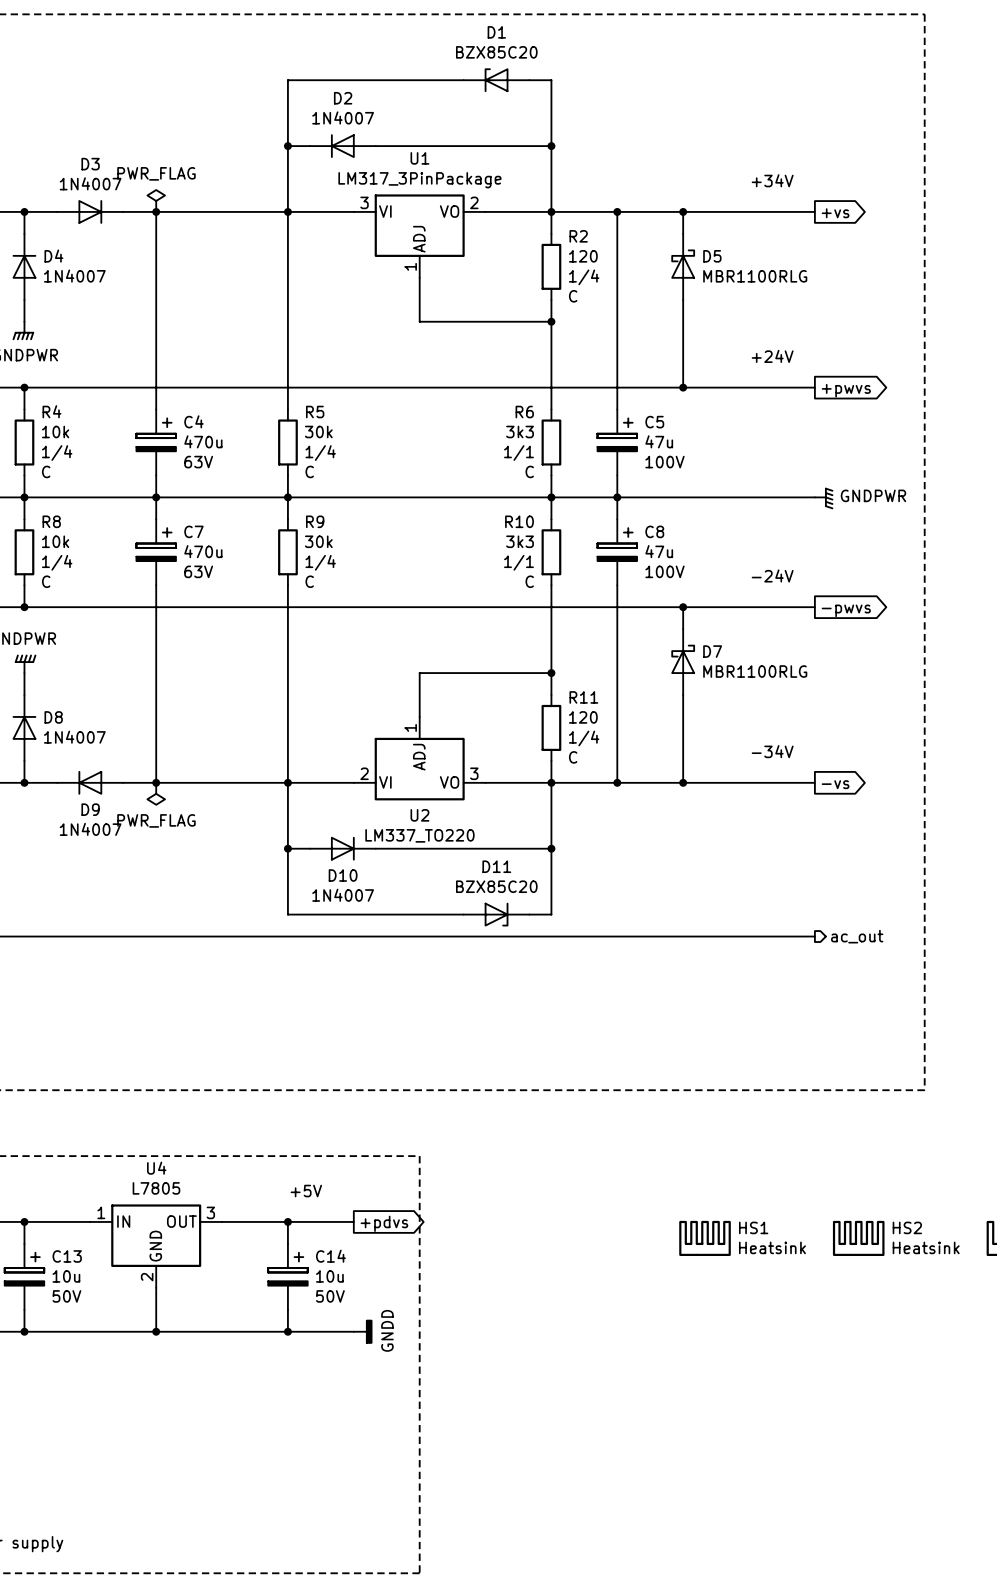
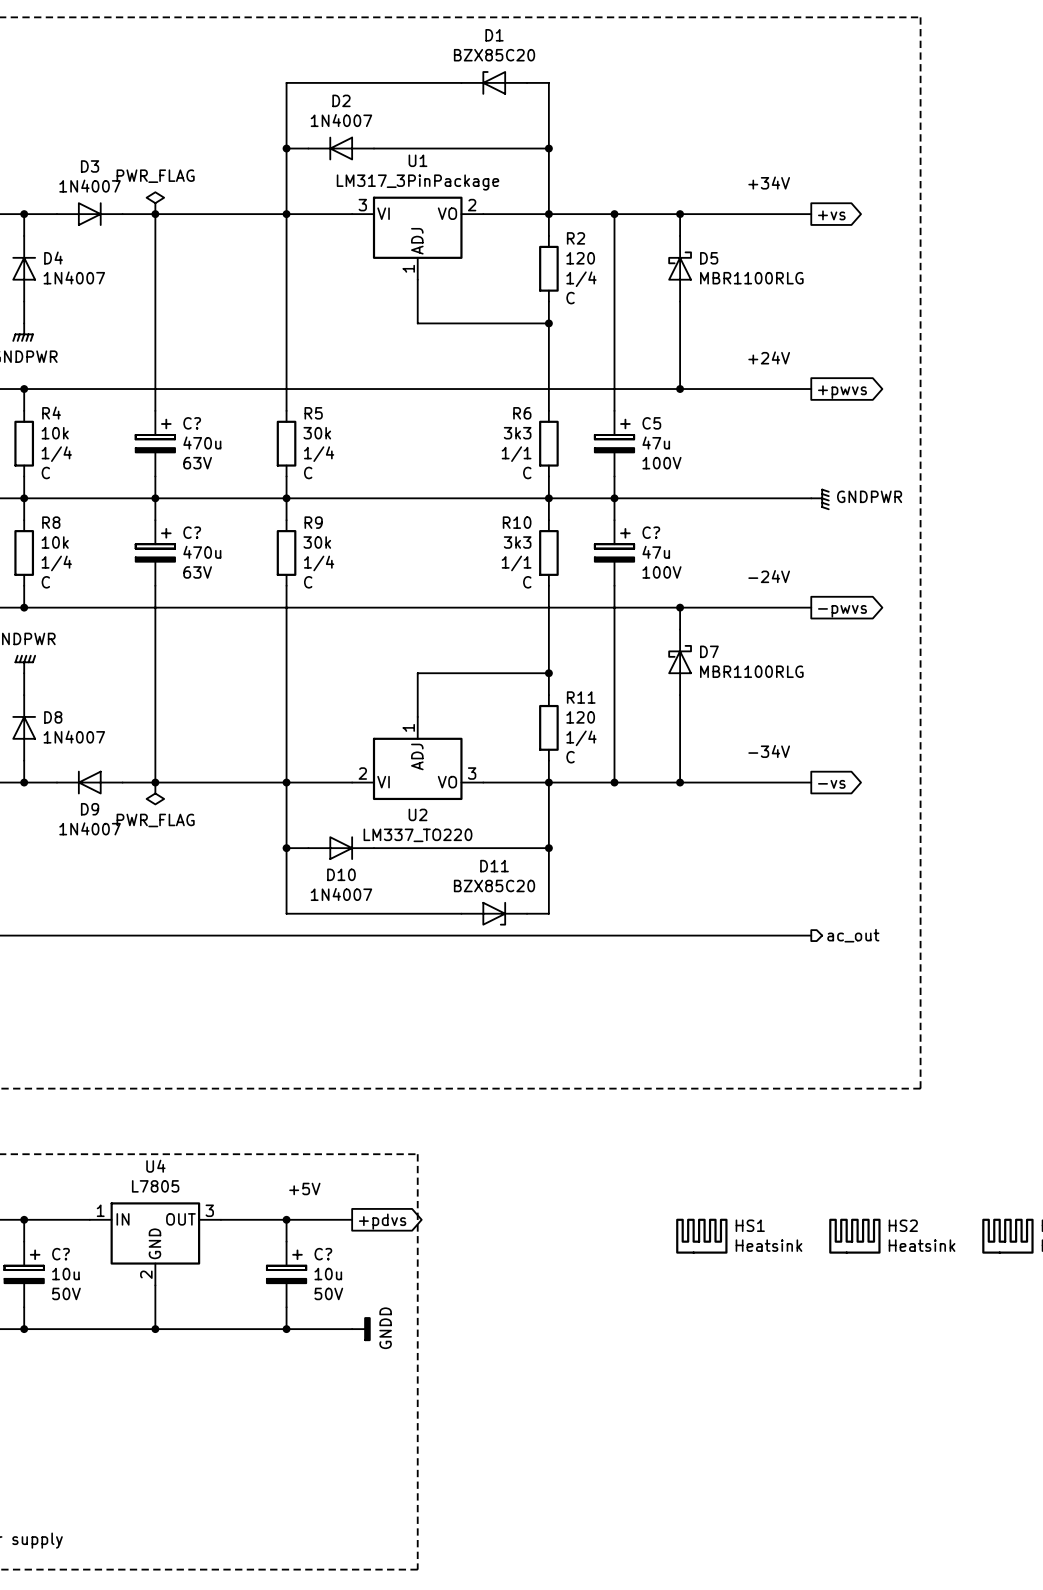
C4 name: C4 (193, 421) -> C? (192, 423)
C7 name: C7 (193, 531) -> C? (192, 532)
C8 name: C8 (654, 531) -> C? (651, 532)
C13 name: C13 (67, 1256) -> C? (61, 1254)
C14 name: C14 (330, 1256) -> C? (323, 1254)

